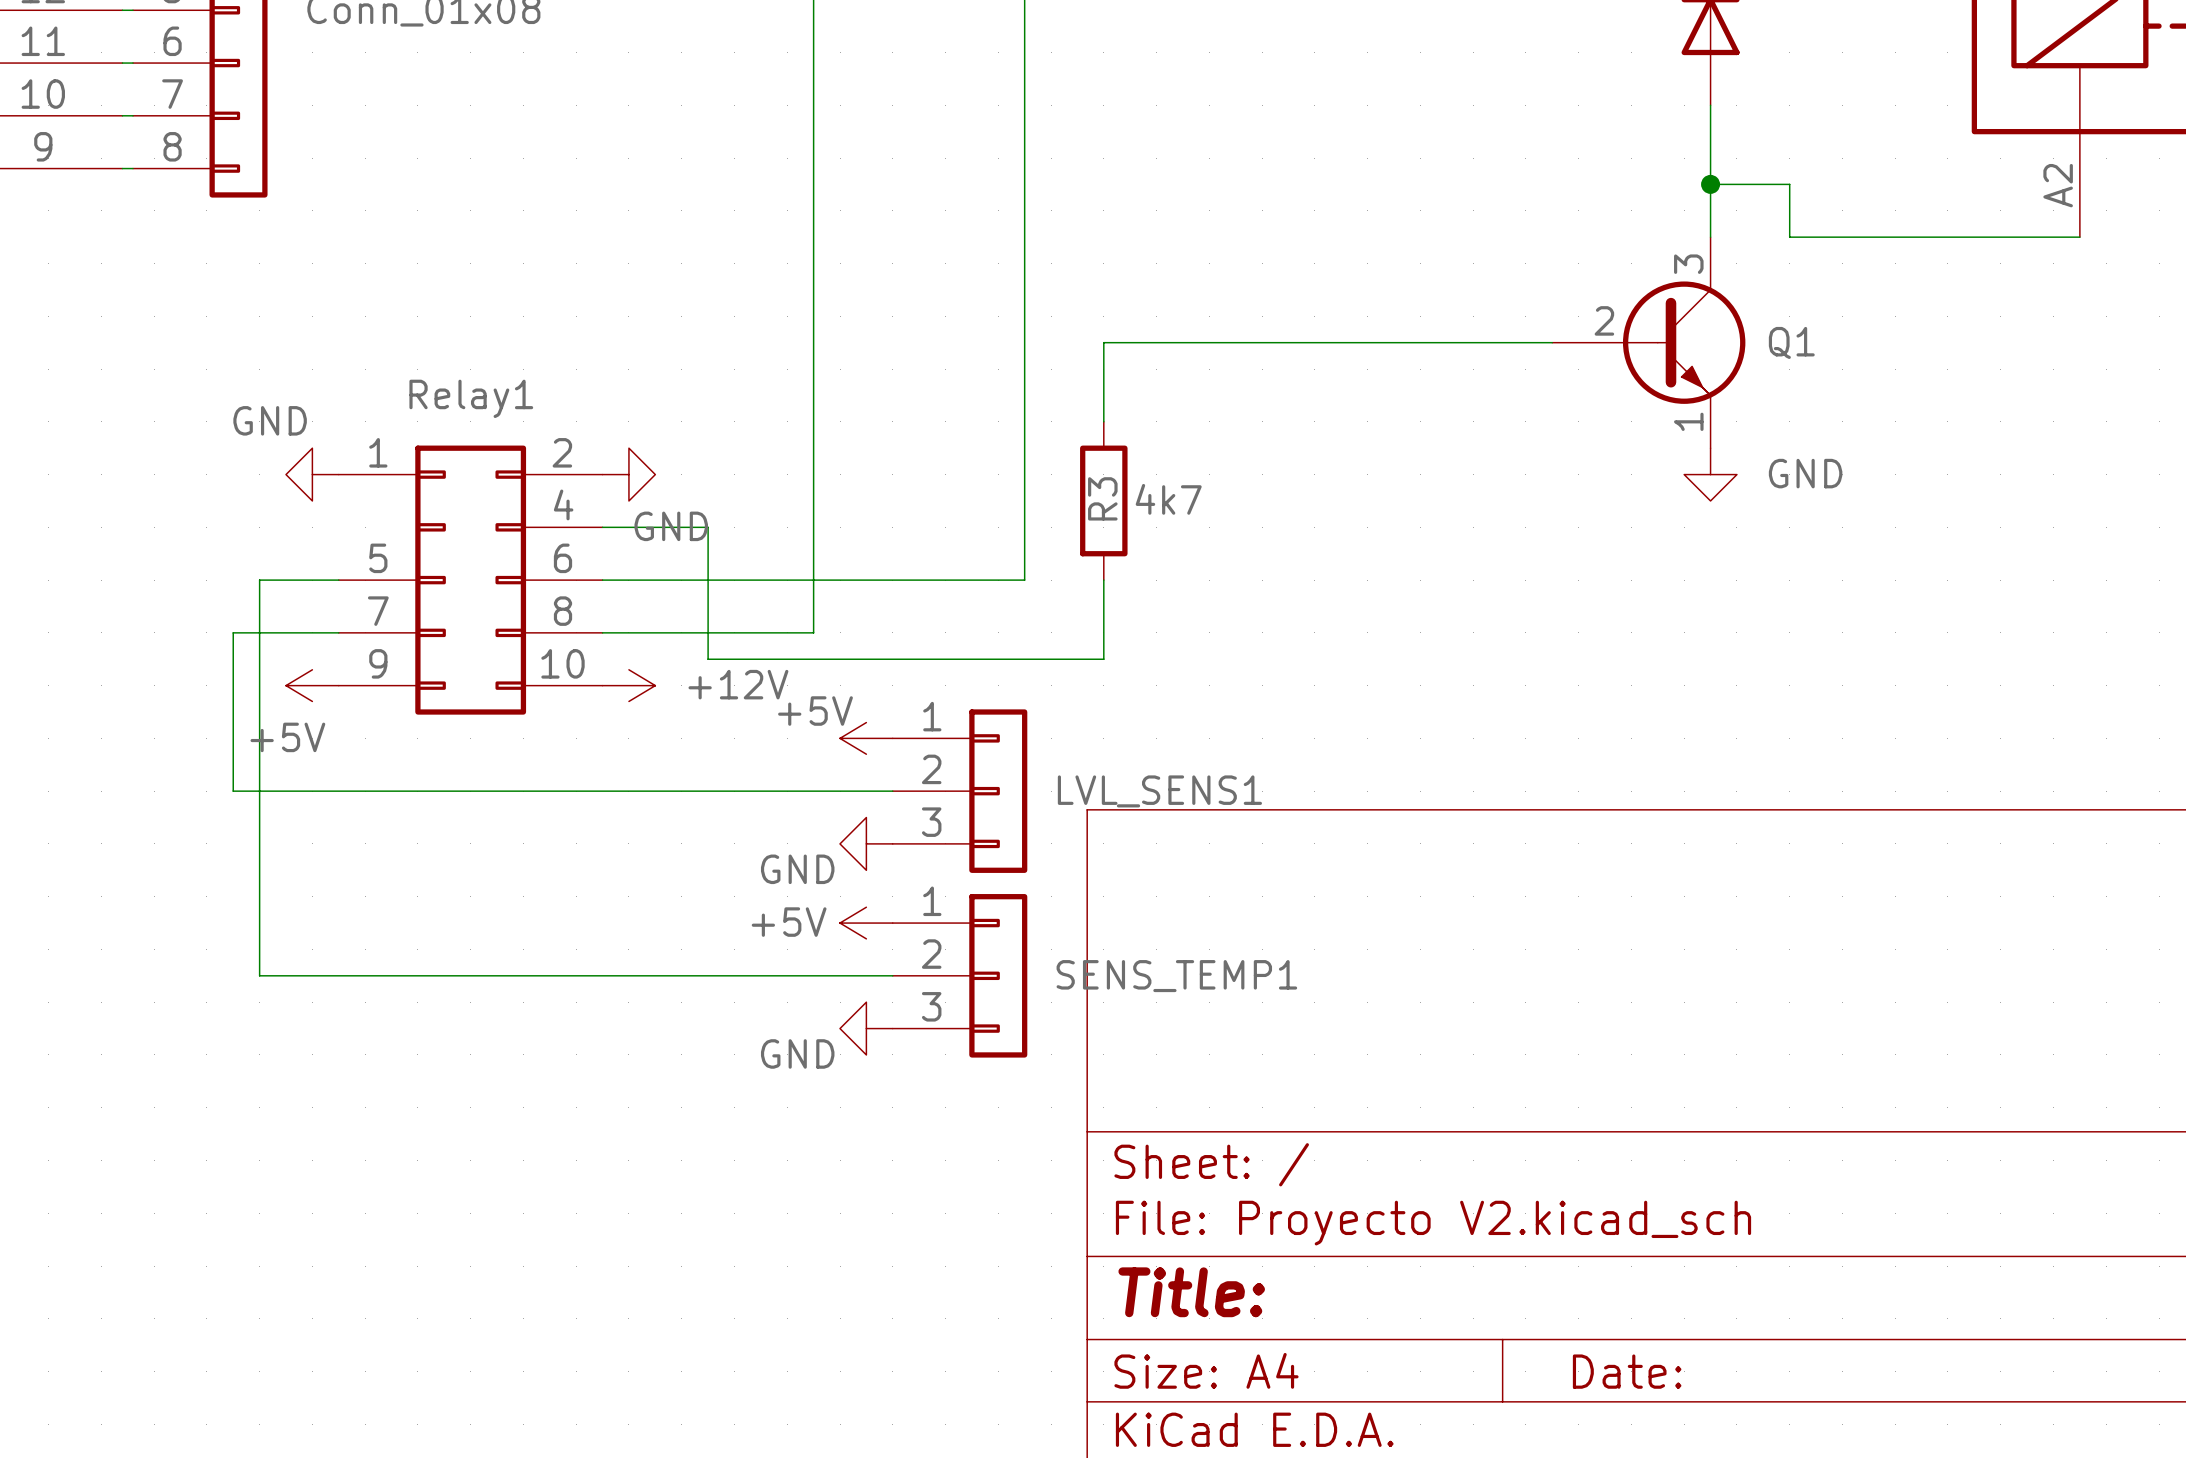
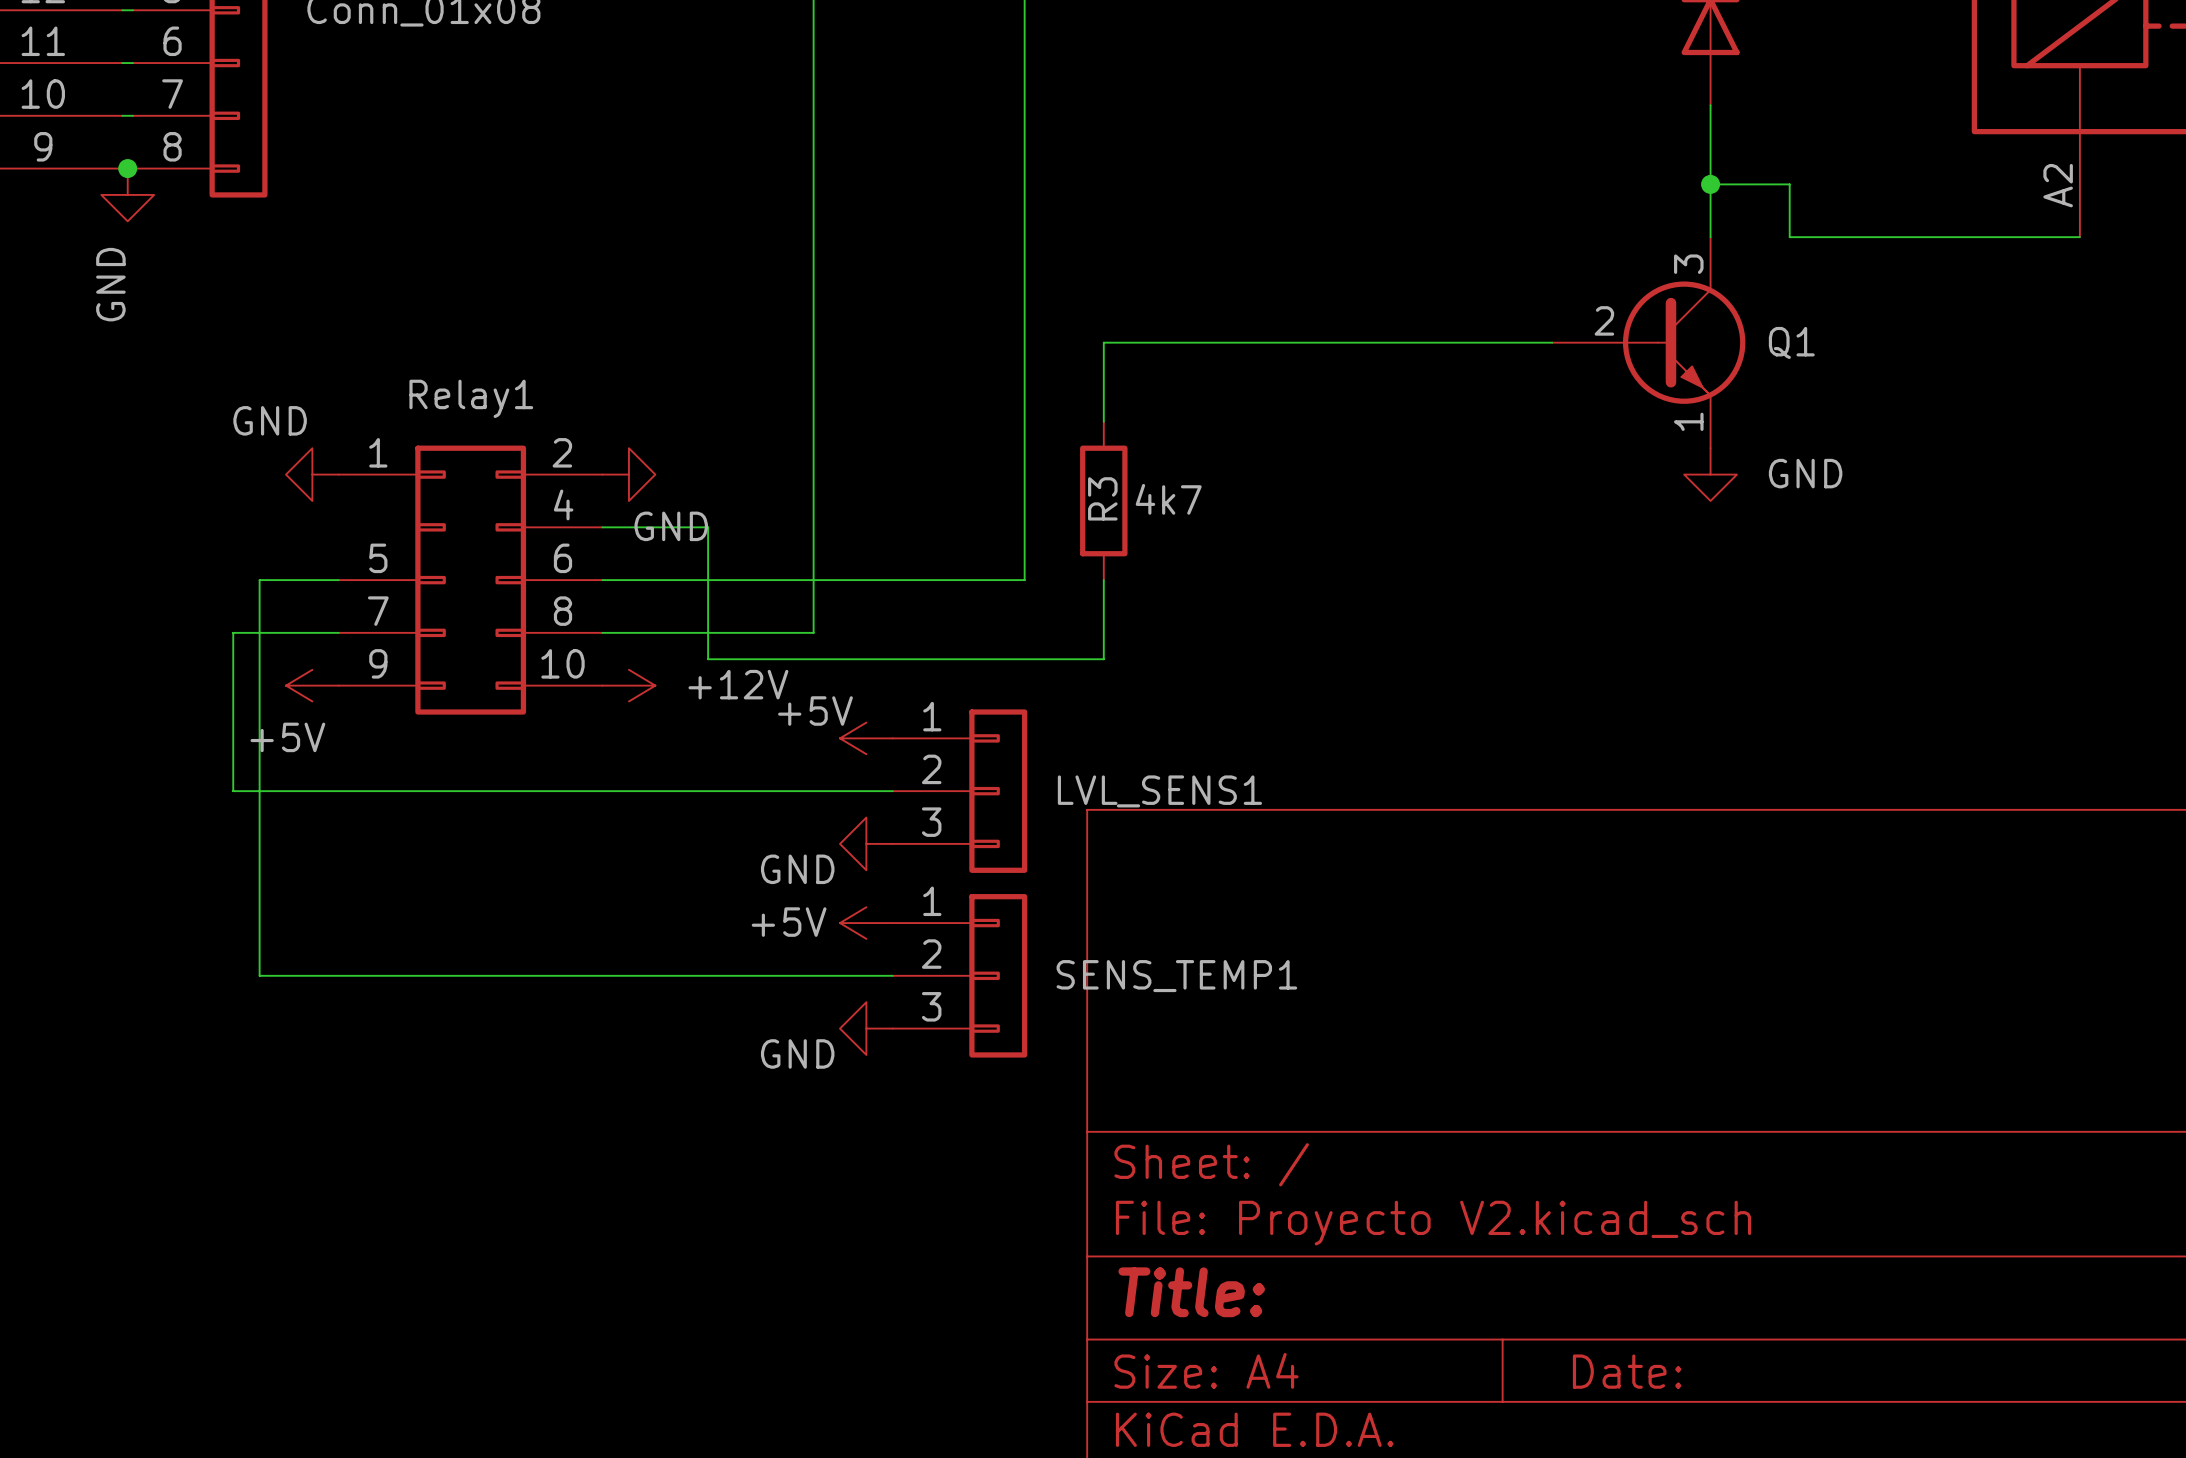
junction: none -> (127, 168)
power symbol: none -> GND (127, 194)

